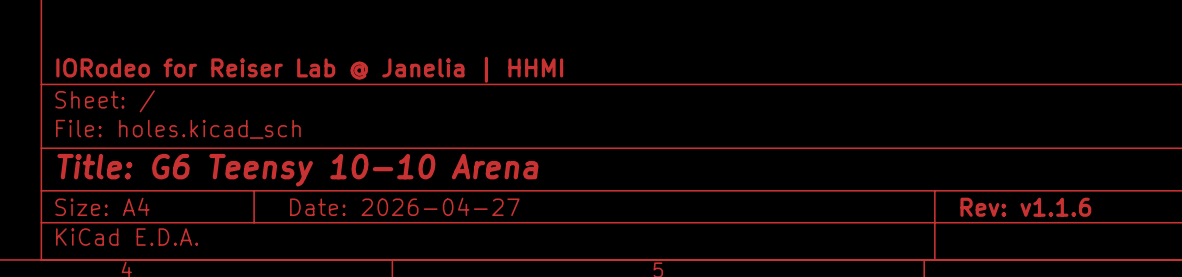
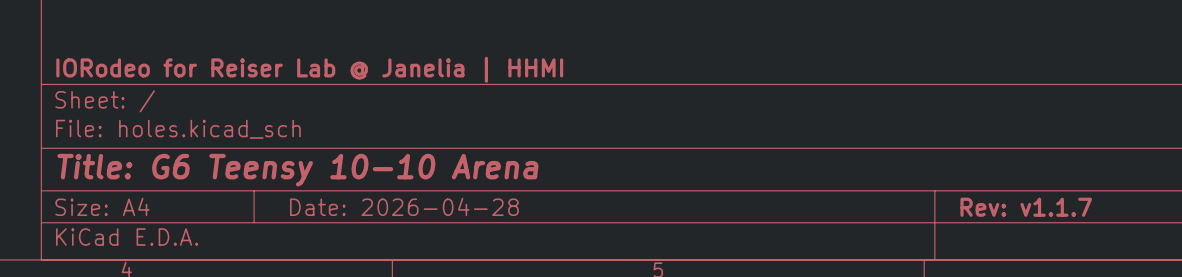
title block: Date: 2026-04-27 (404, 206) -> Date: 2026-04-28 (404, 206)
title block: Rev: v1.1.6 (1025, 207) -> Rev: v1.1.7 (1026, 207)

